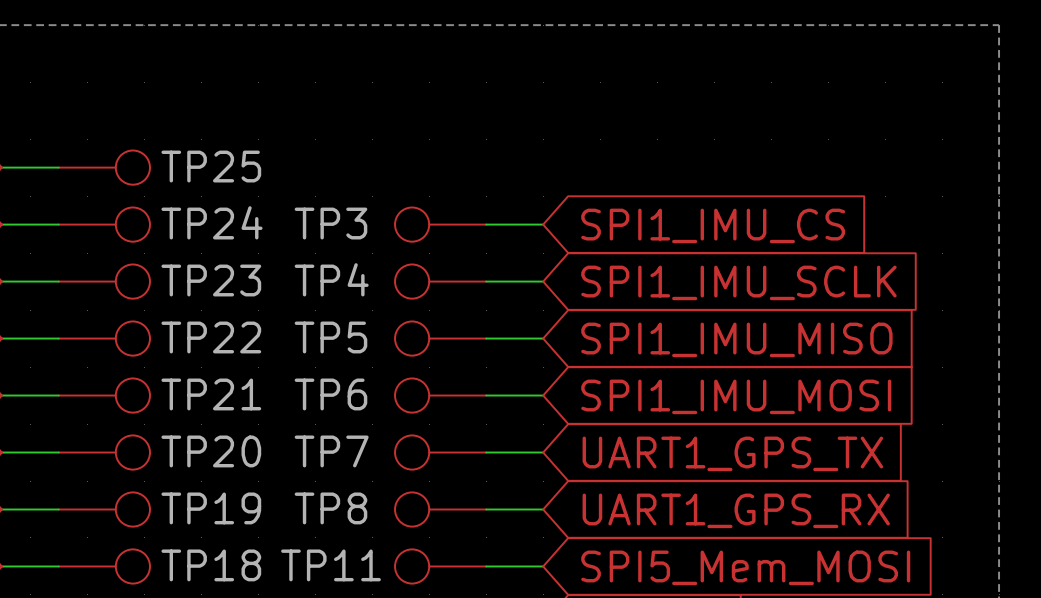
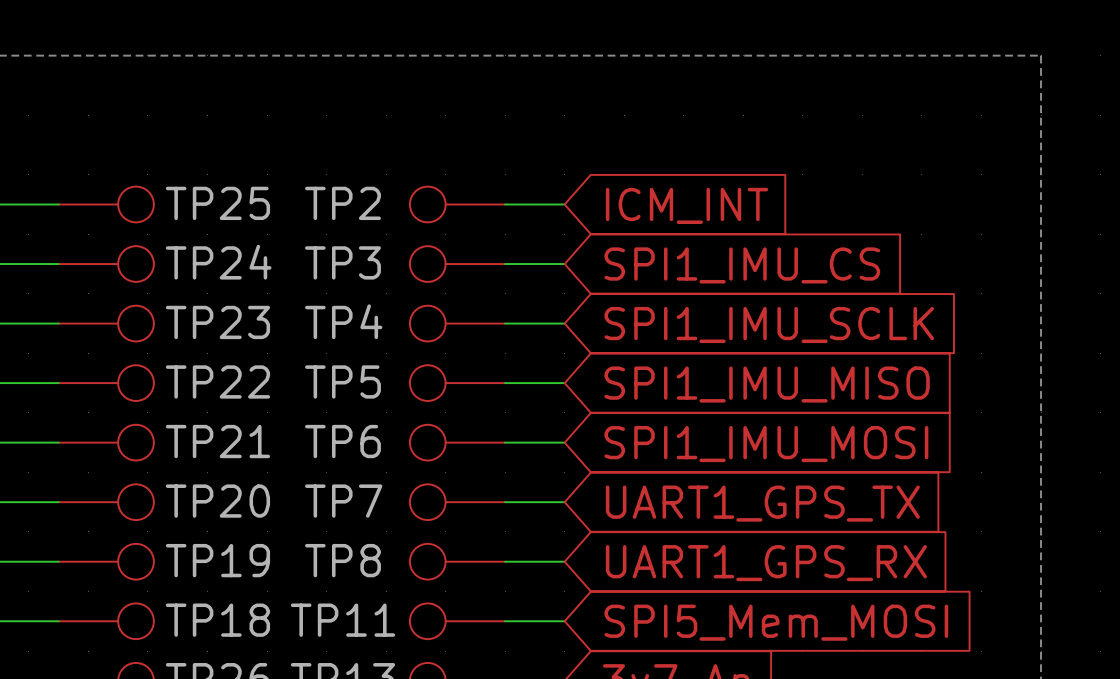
TP2: none -> (457, 204)
wire: none -> (505, 204) (564, 204)
global label: none -> ICM_INT (687, 205)

